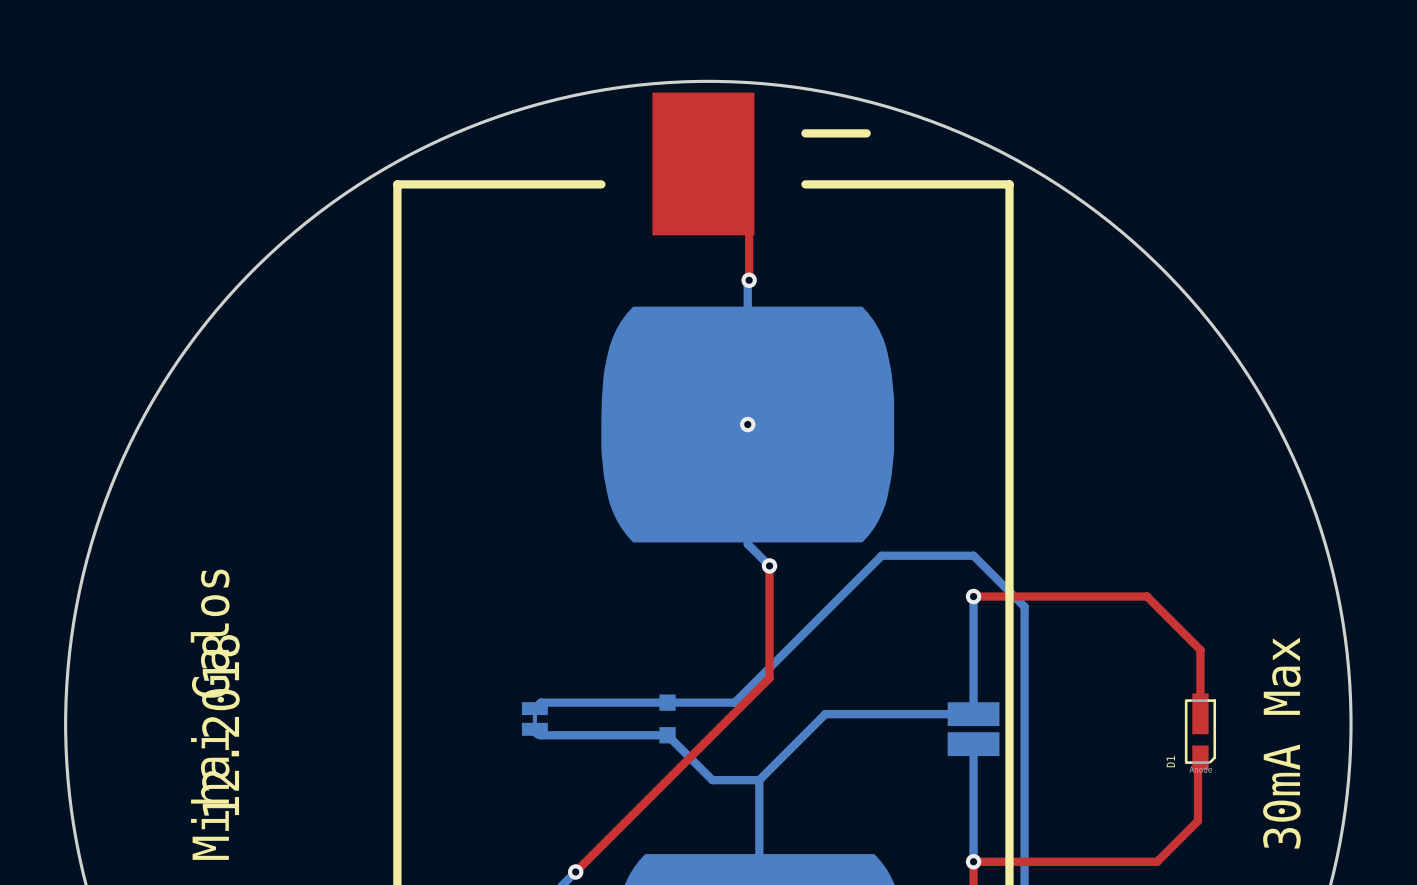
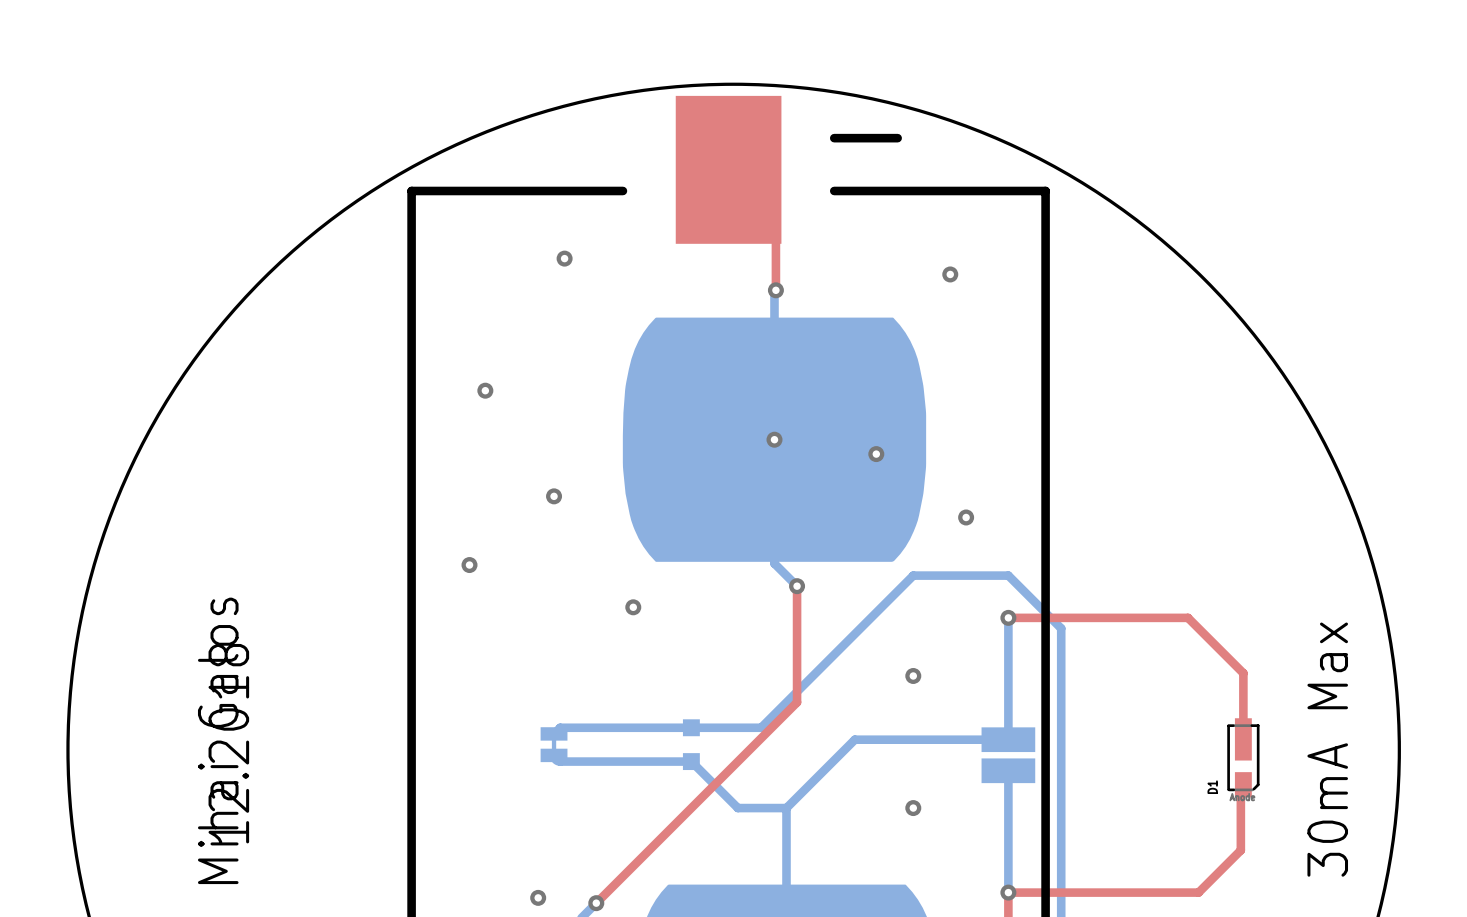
via: none -> (564, 258)
via: none -> (950, 274)
via: none -> (485, 390)
via: none -> (876, 454)
via: none -> (554, 496)
via: none -> (966, 517)
via: none -> (469, 565)
via: none -> (633, 607)
via: none -> (913, 675)
via: none -> (913, 808)
via: none -> (538, 897)

